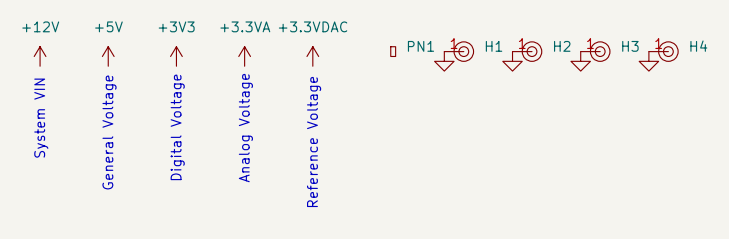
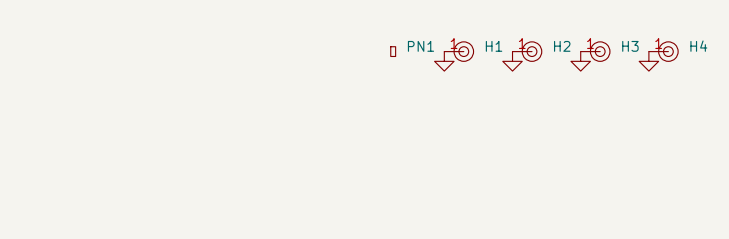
power symbol: +12V (40, 56) -> none
power symbol: +5V (108, 56) -> none
power symbol: +3V3 (176, 56) -> none
power symbol: +3.3VA (244, 56) -> none
power symbol: +3.3VDAC (312, 56) -> none
text: System VIN (41, 118) -> none
text: Digital Voltage (177, 127) -> none
text: Analog Voltage (245, 128) -> none
text: General Voltage (109, 132) -> none
text: Reference Voltage (314, 141) -> none

